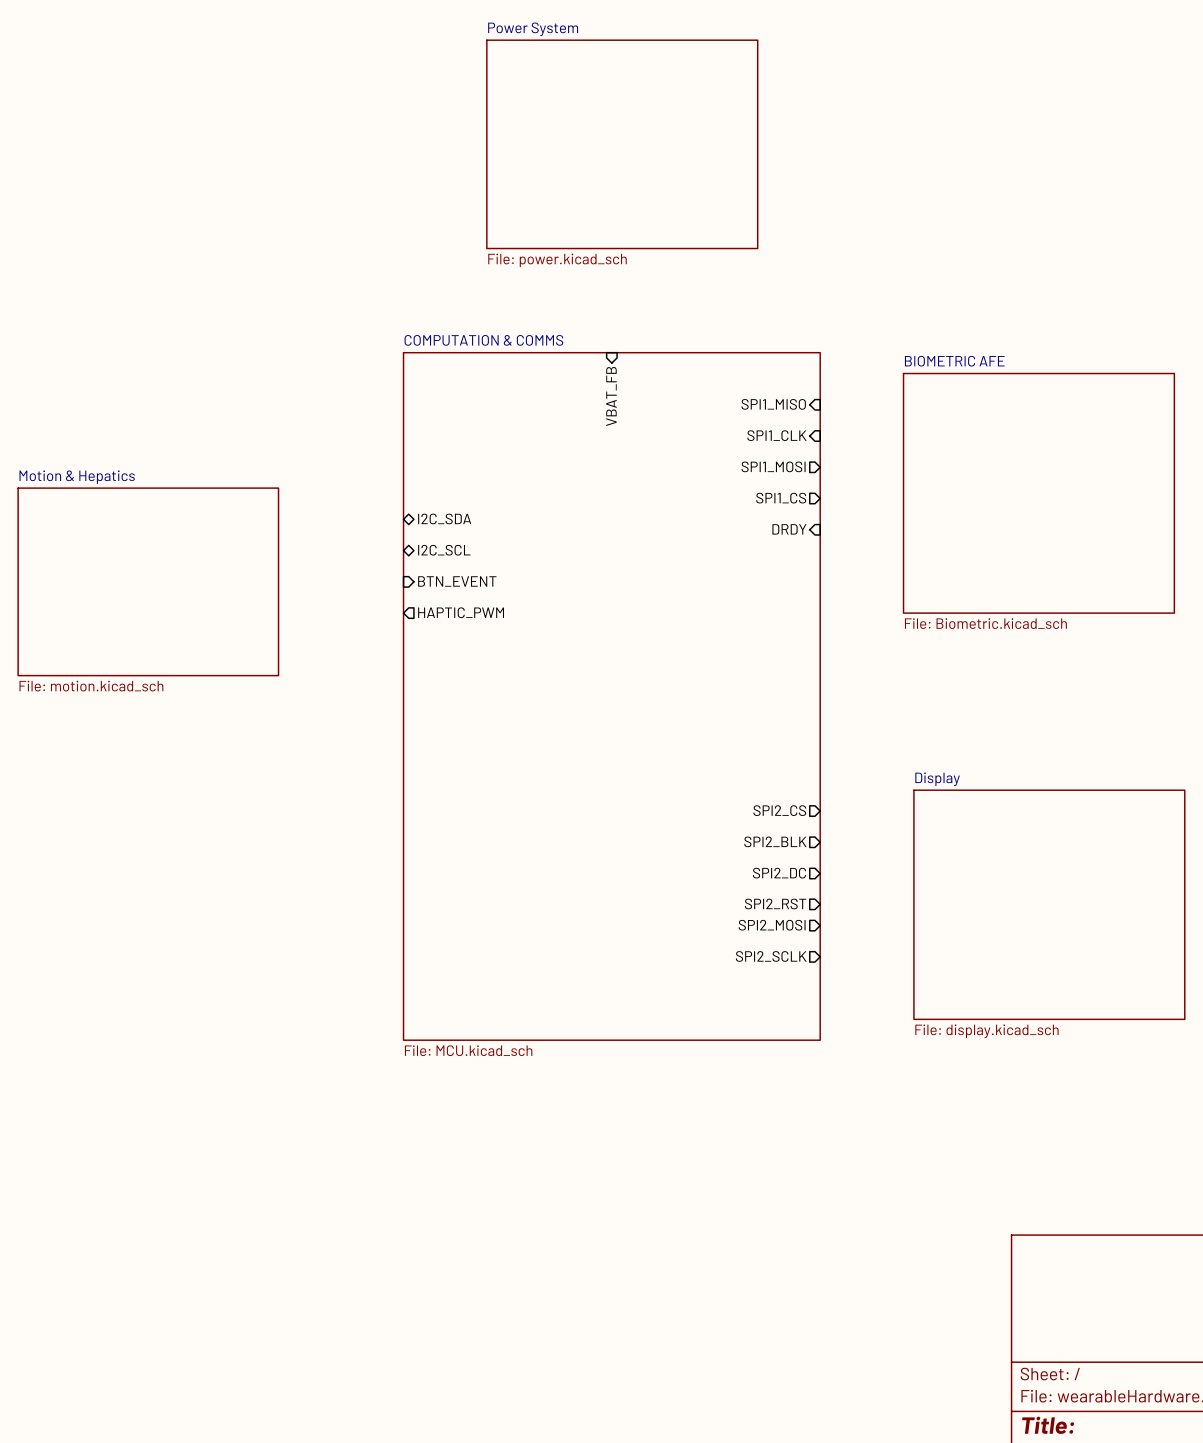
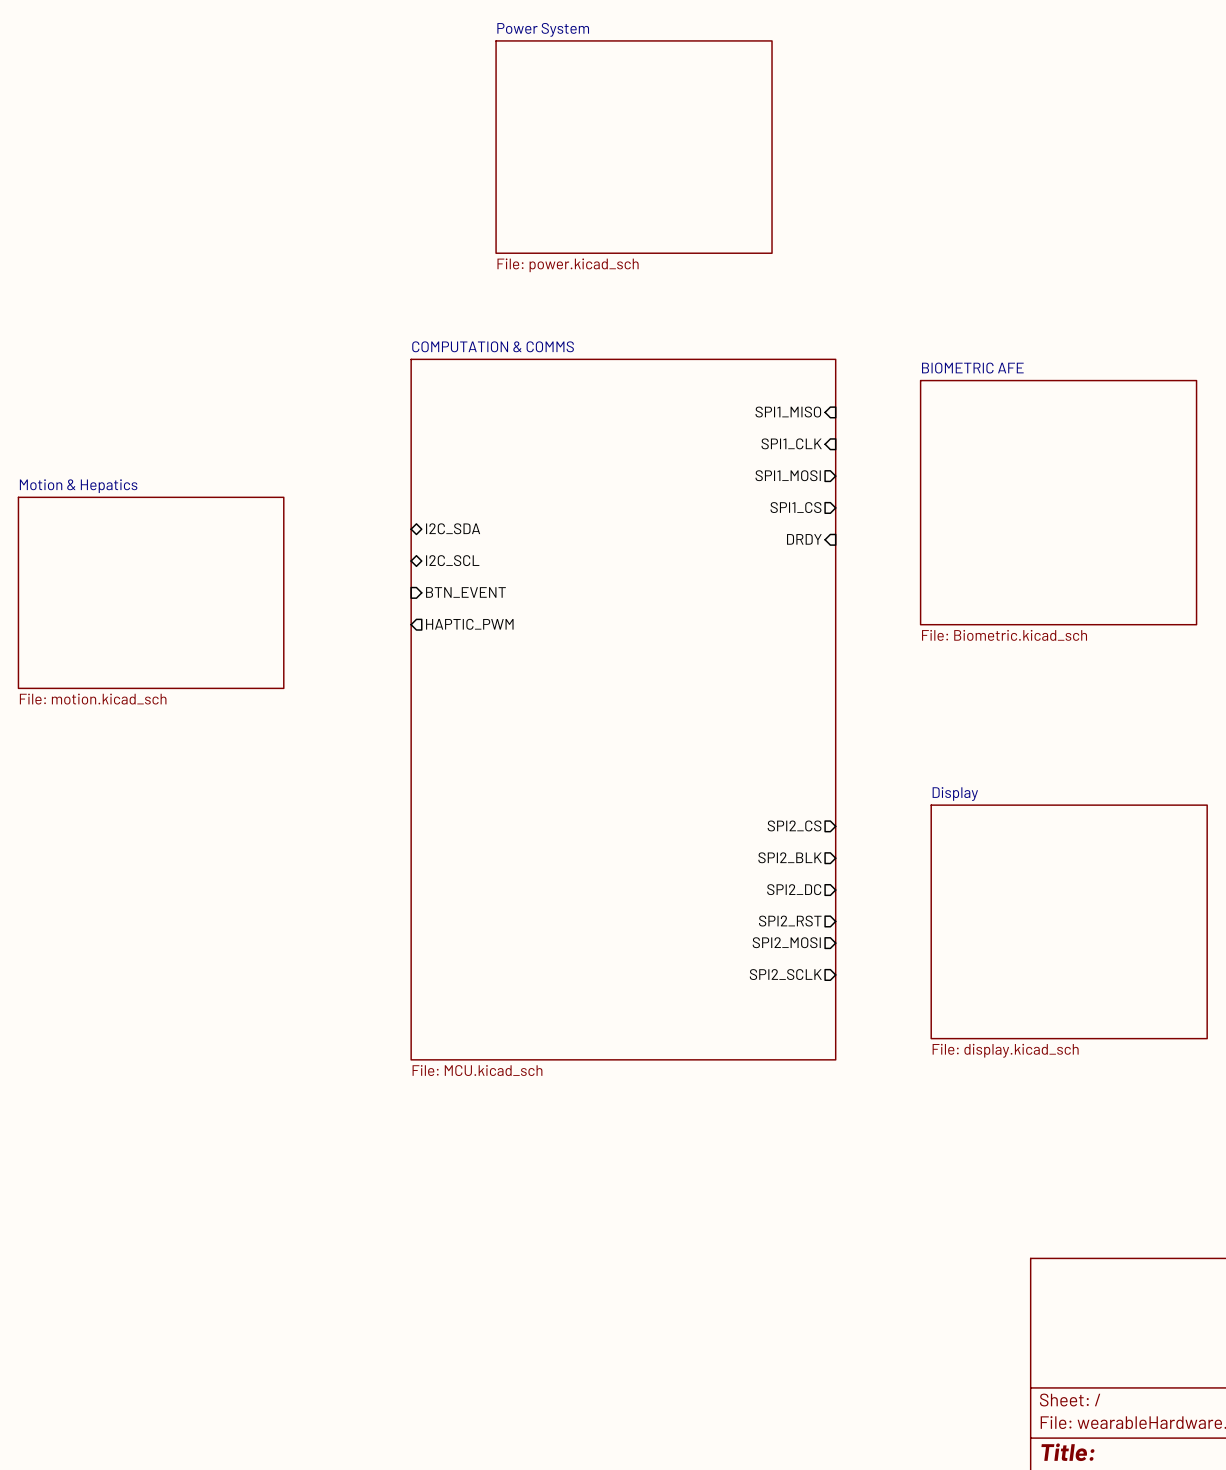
sheet pin: VBAT_FB (611, 396) -> none

